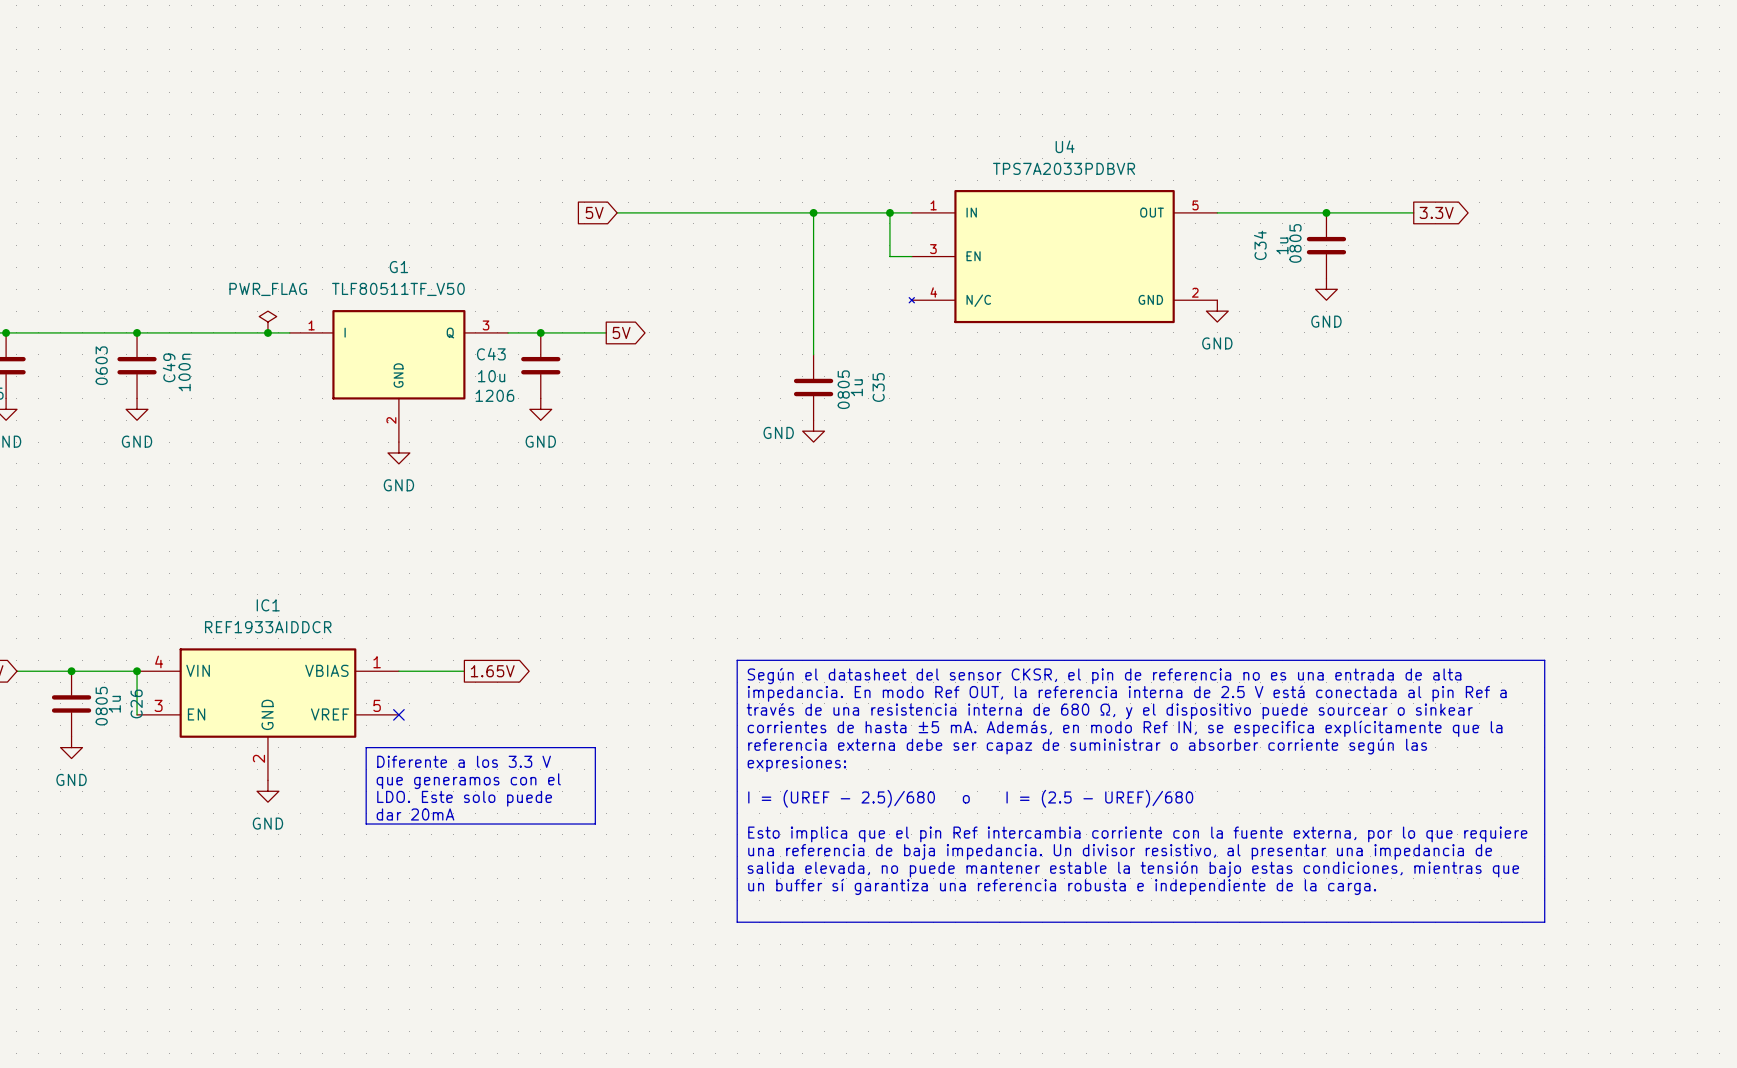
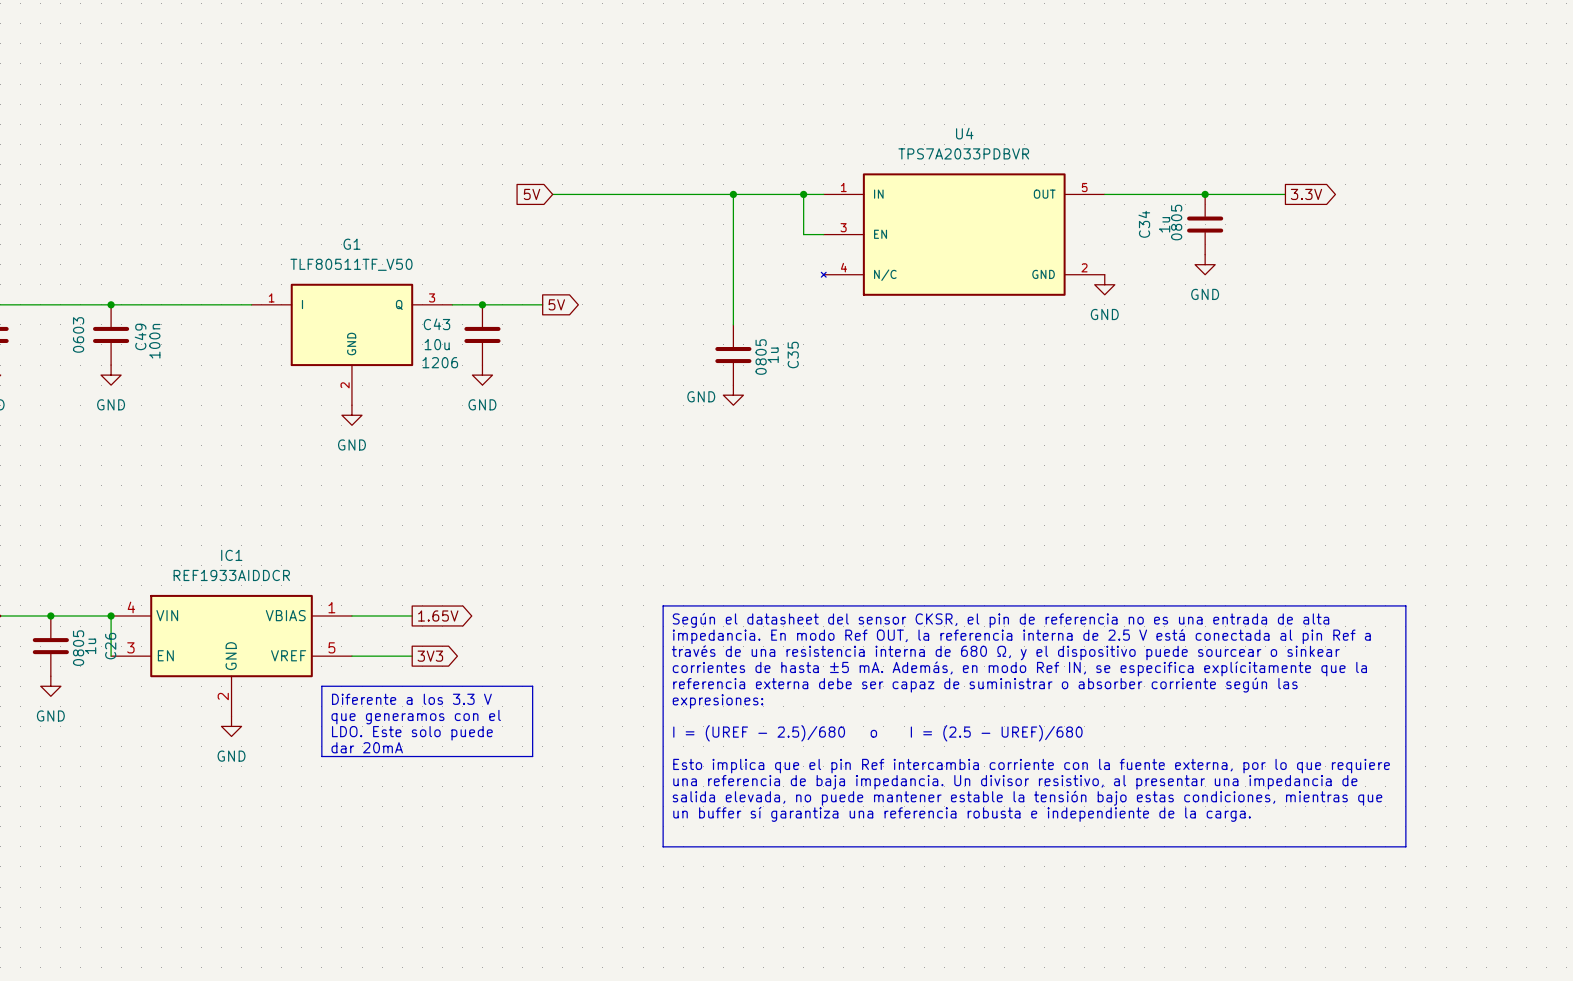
power symbol: PWR_FLAG (267, 322) -> none
junction: (267, 332) -> none
wire: none -> (351, 656) (412, 656)
no-connect mark: (398, 714) -> none
global label: none -> 3V3 (430, 656)

